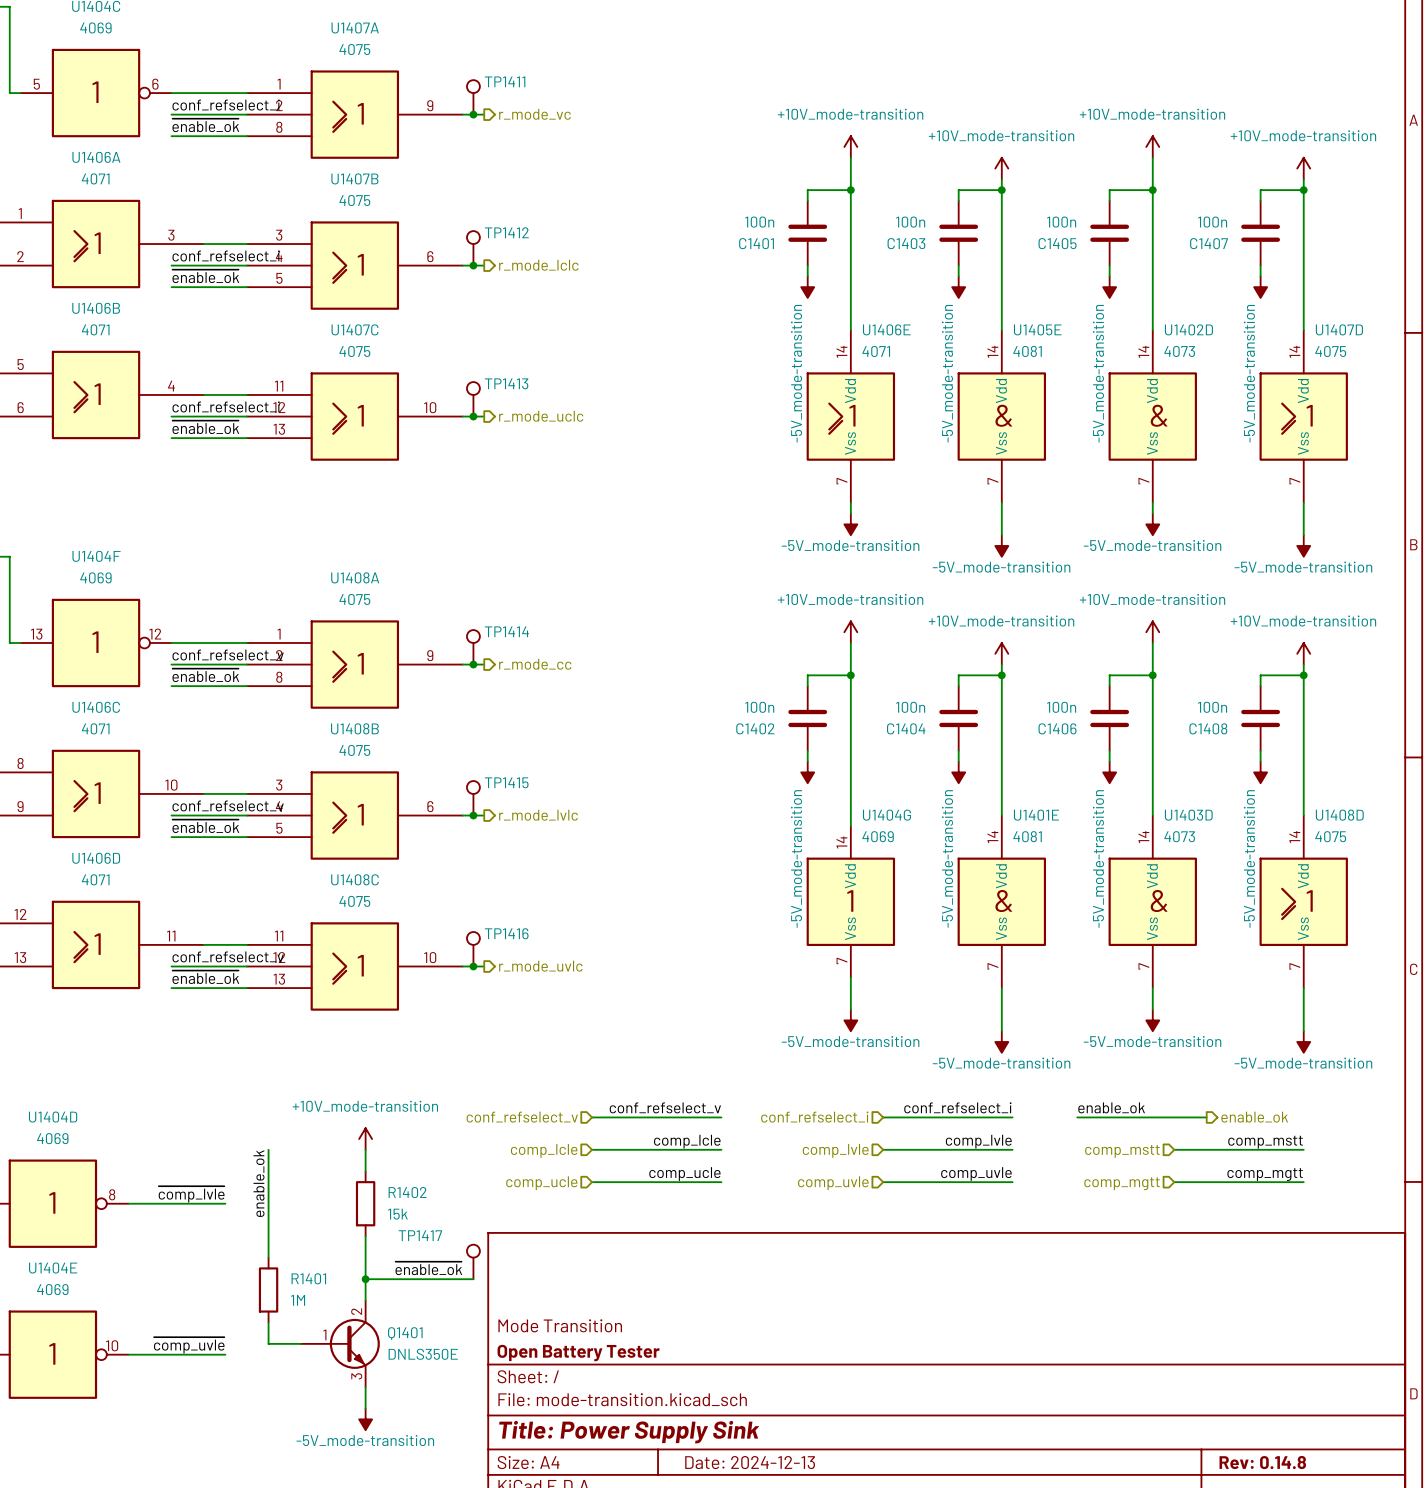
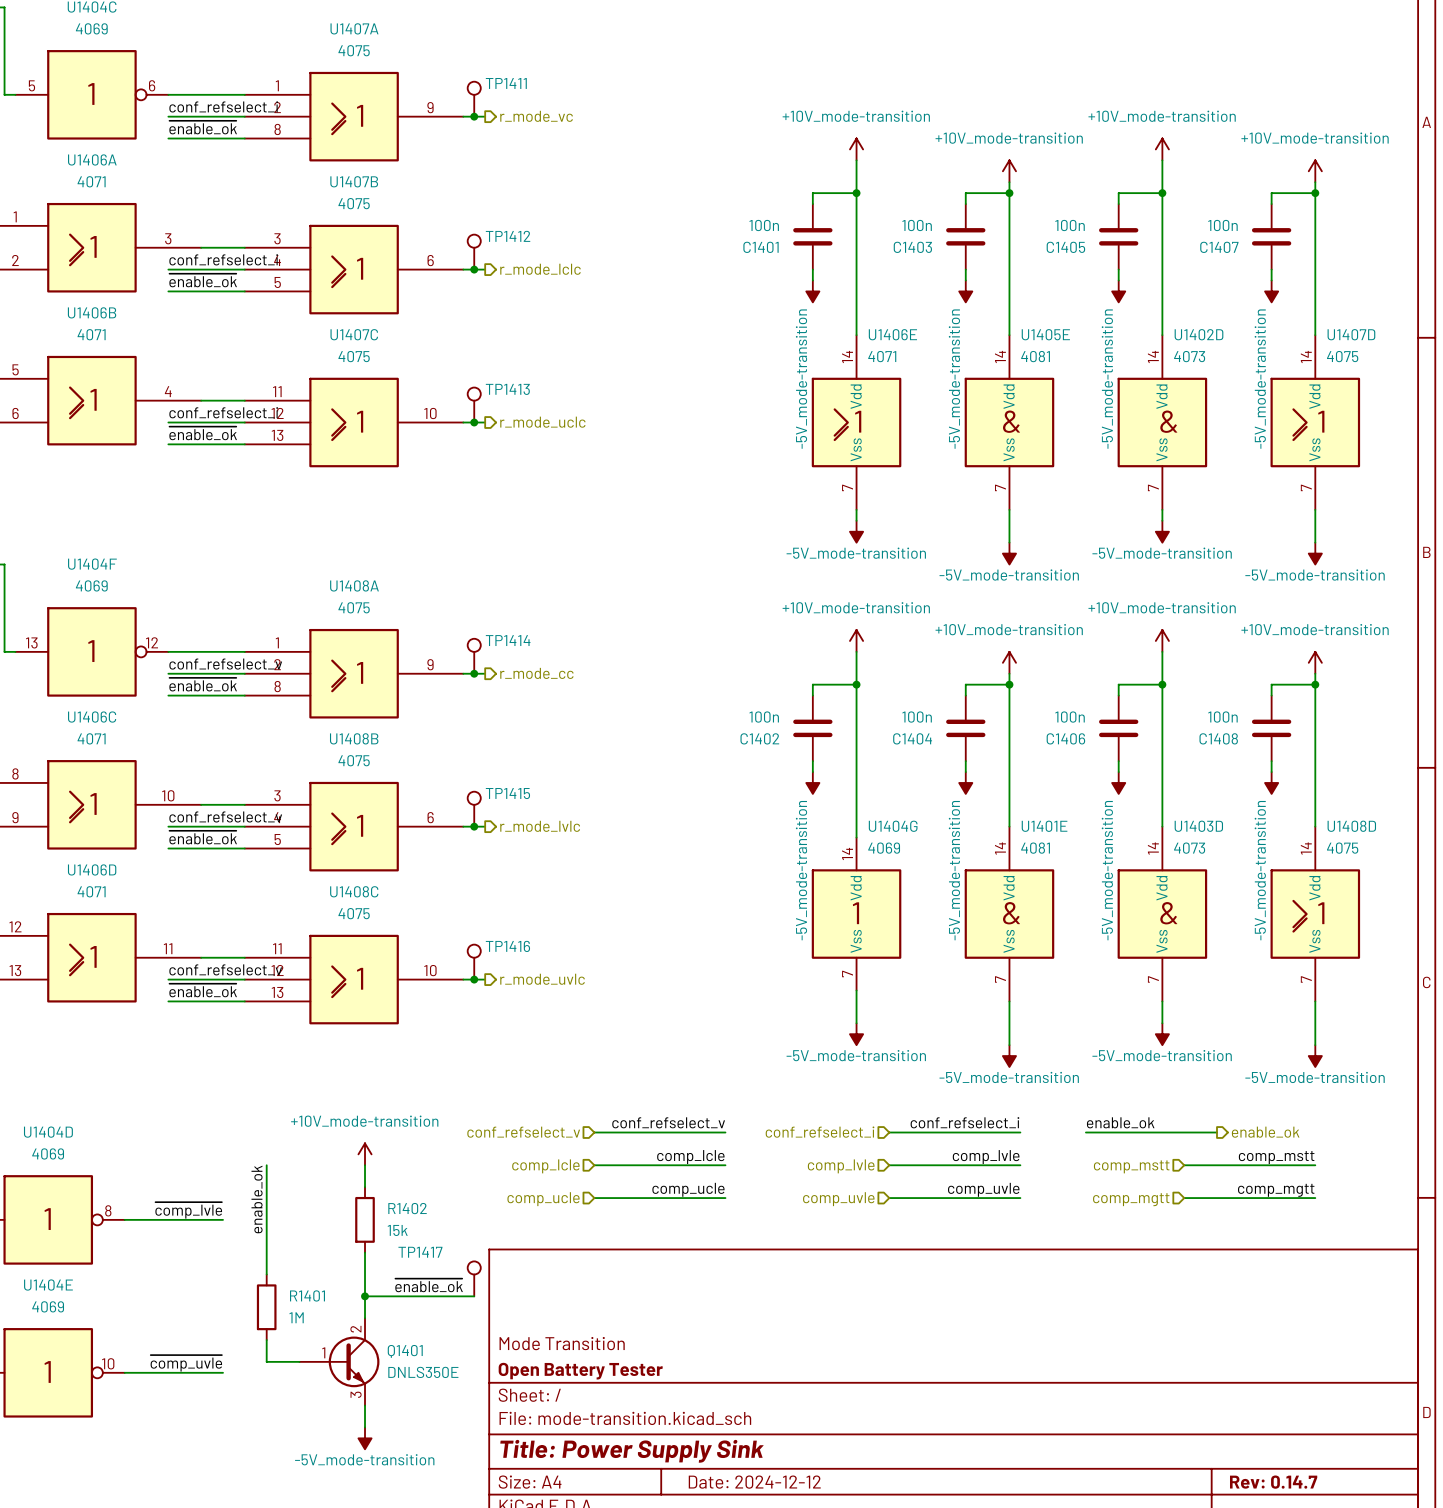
title block: Date: 2024-12-13 (750, 1462) -> Date: 2024-12-12 (754, 1482)
title block: Rev: 0.14.8 (1262, 1462) -> Rev: 0.14.7 (1273, 1482)

